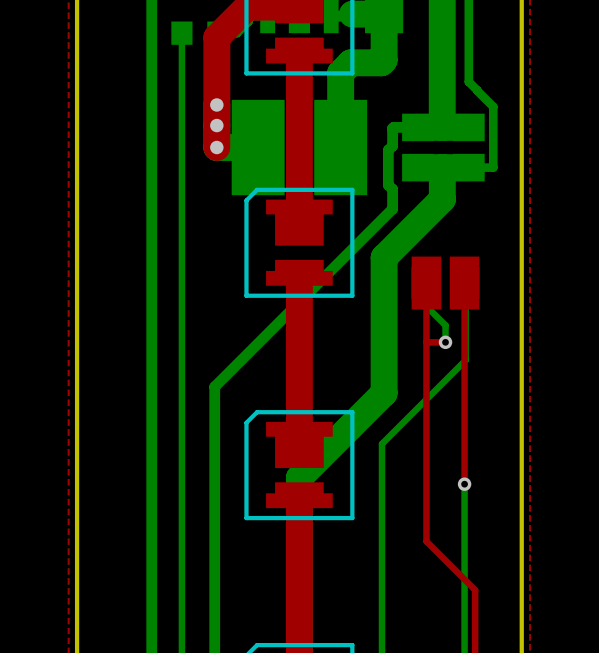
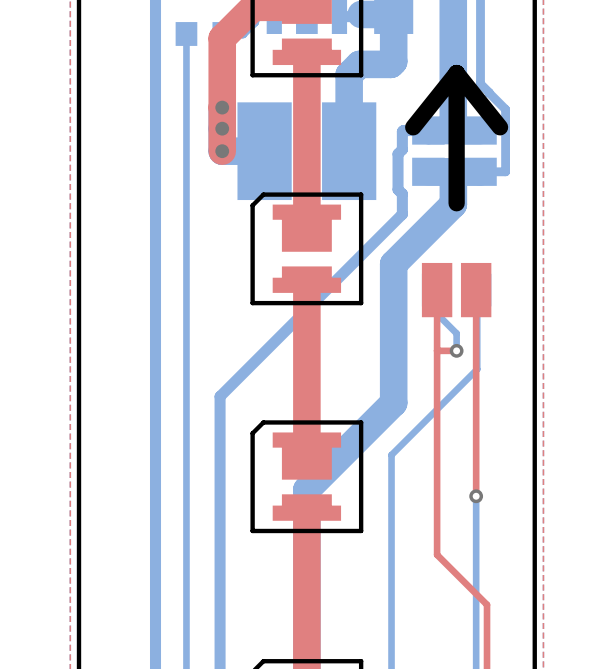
line: none -> (456, 73) (413, 127)
line: none -> (456, 73) (500, 127)
line: none -> (456, 73) (456, 203)

